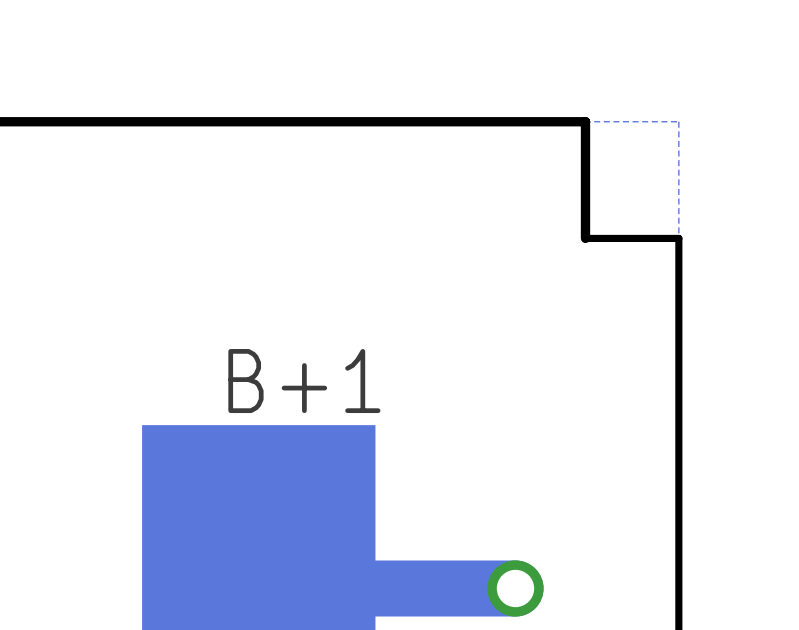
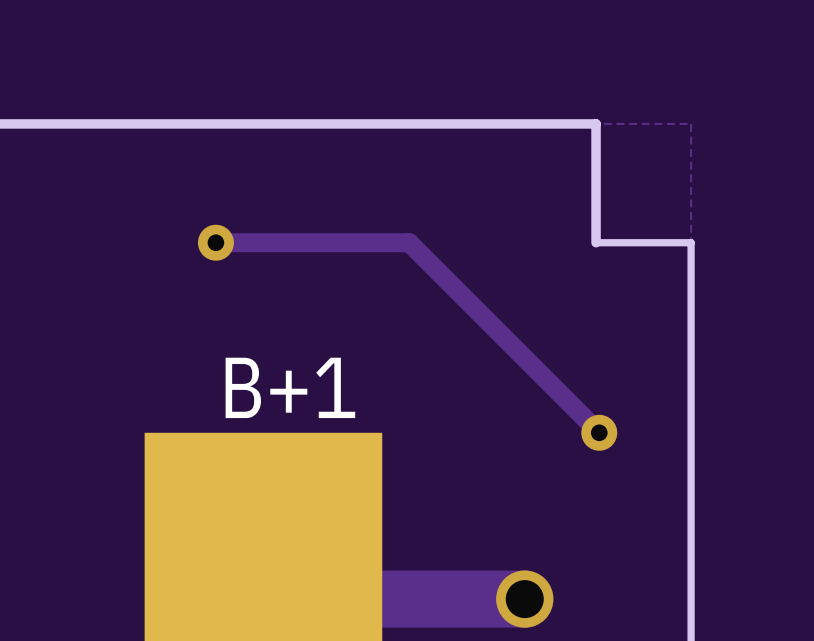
track: none -> (215, 242) (409, 242) (599, 432)
via: none -> (215, 242)
via: none -> (599, 432)

